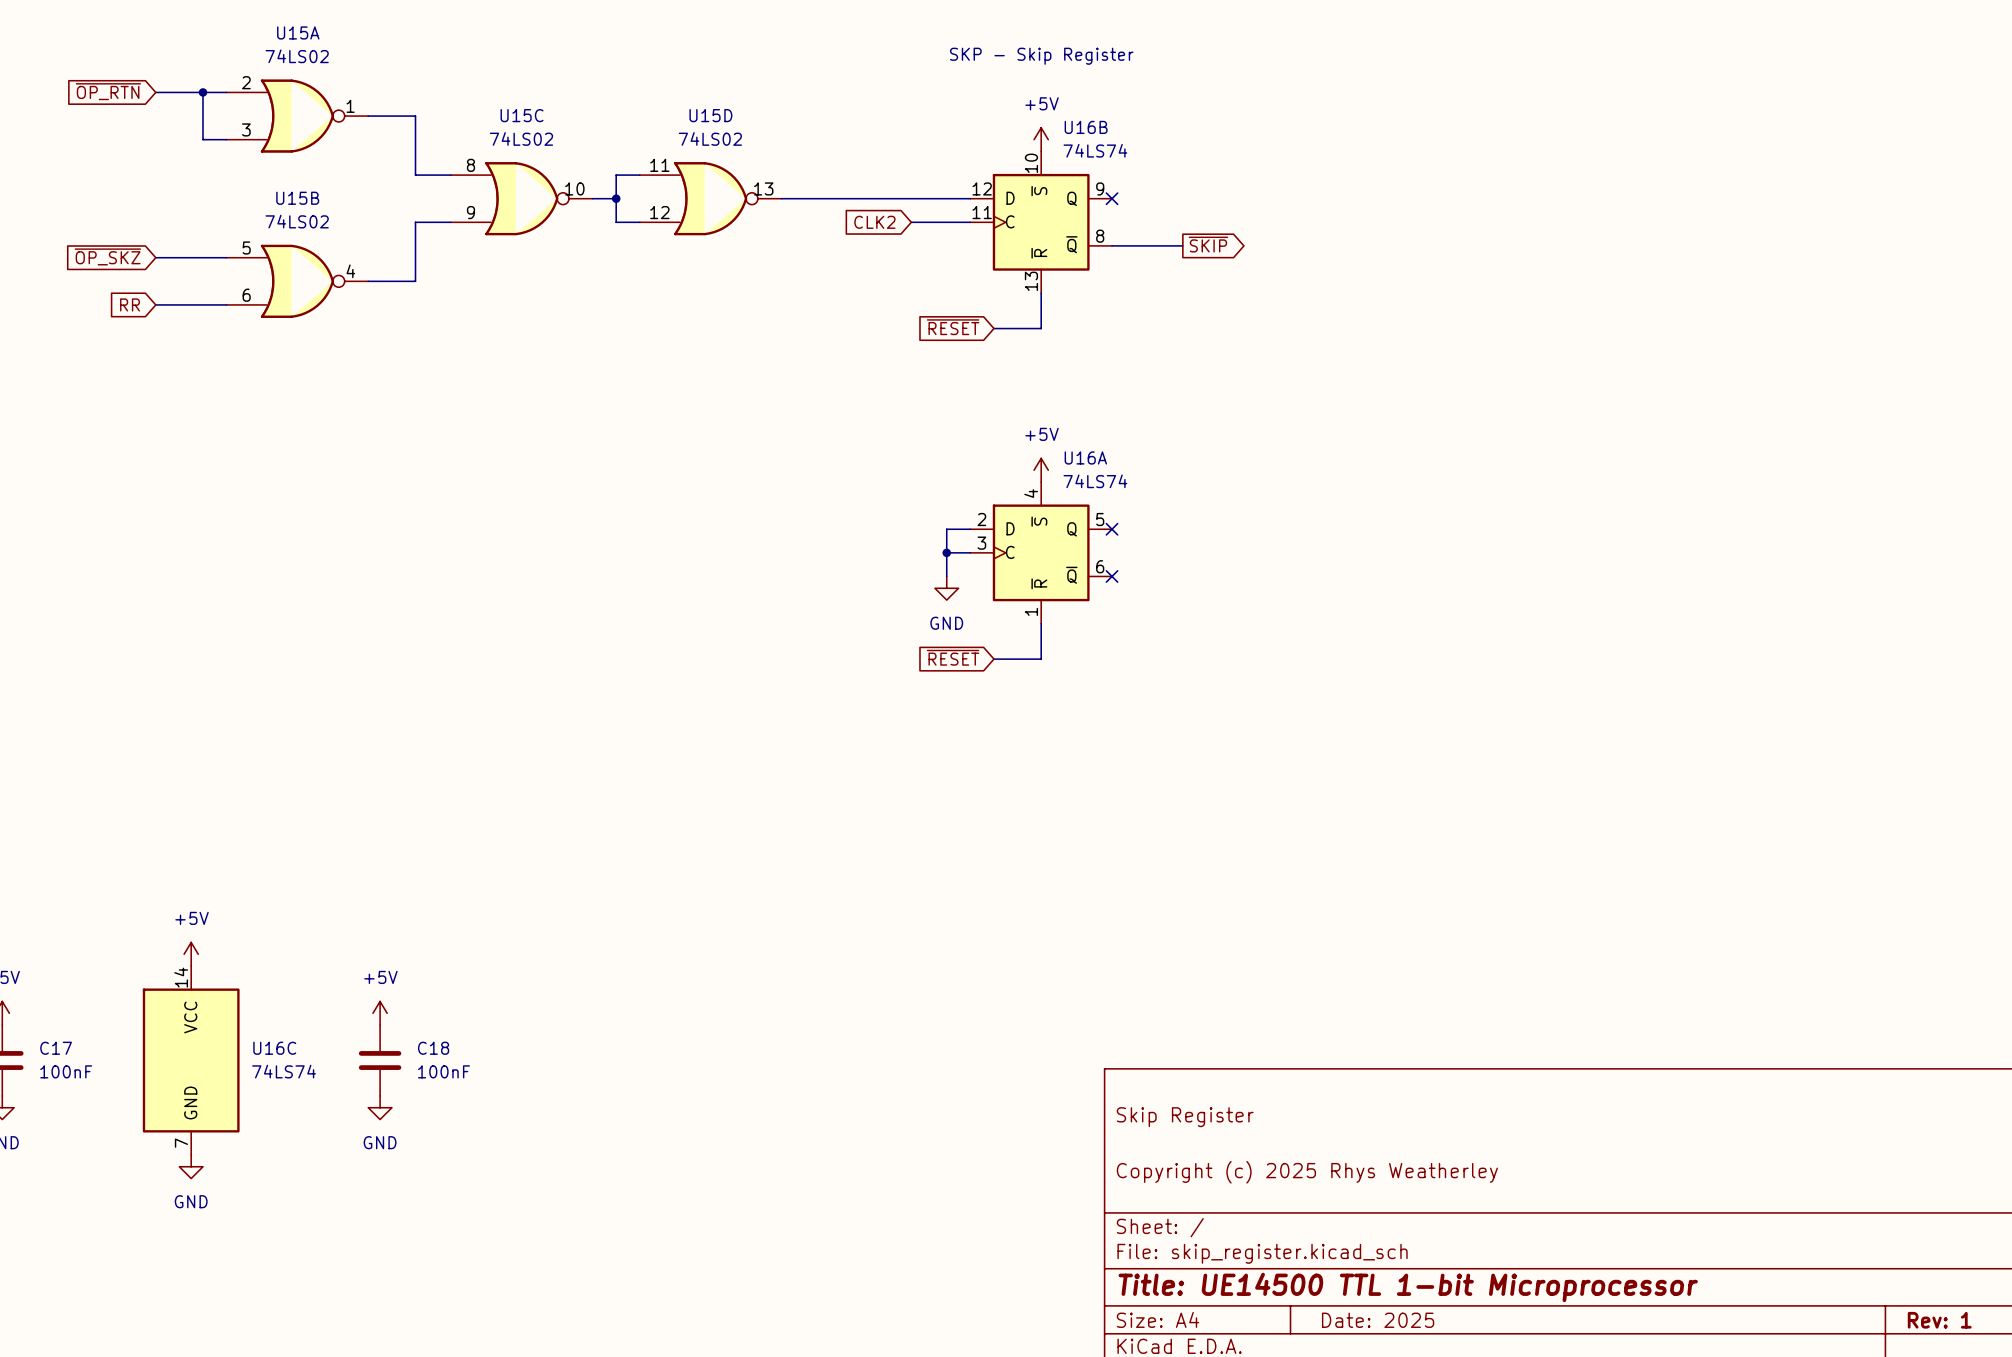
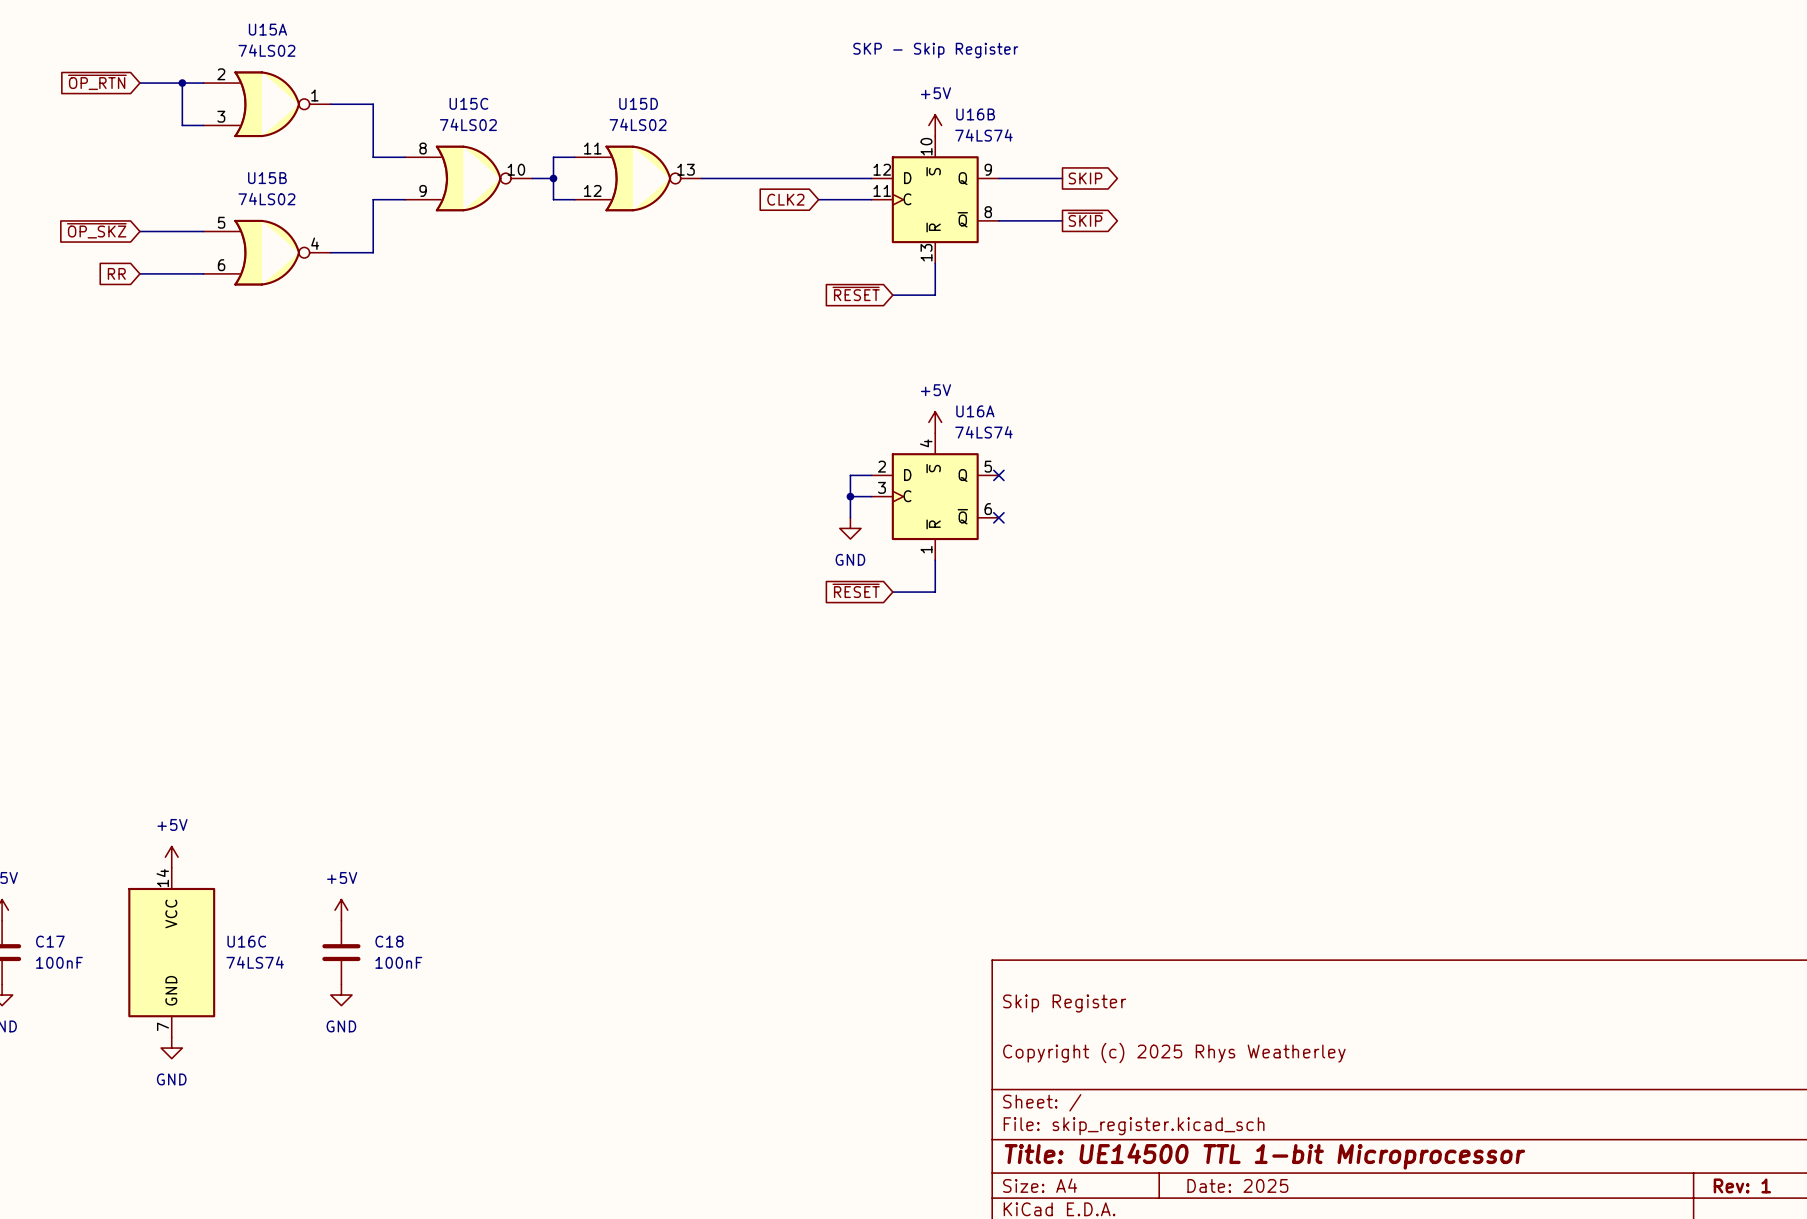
wire: none -> (998, 178) (1062, 178)
no-connect mark: (1112, 198) -> none
global label: none -> SKIP (1085, 178)

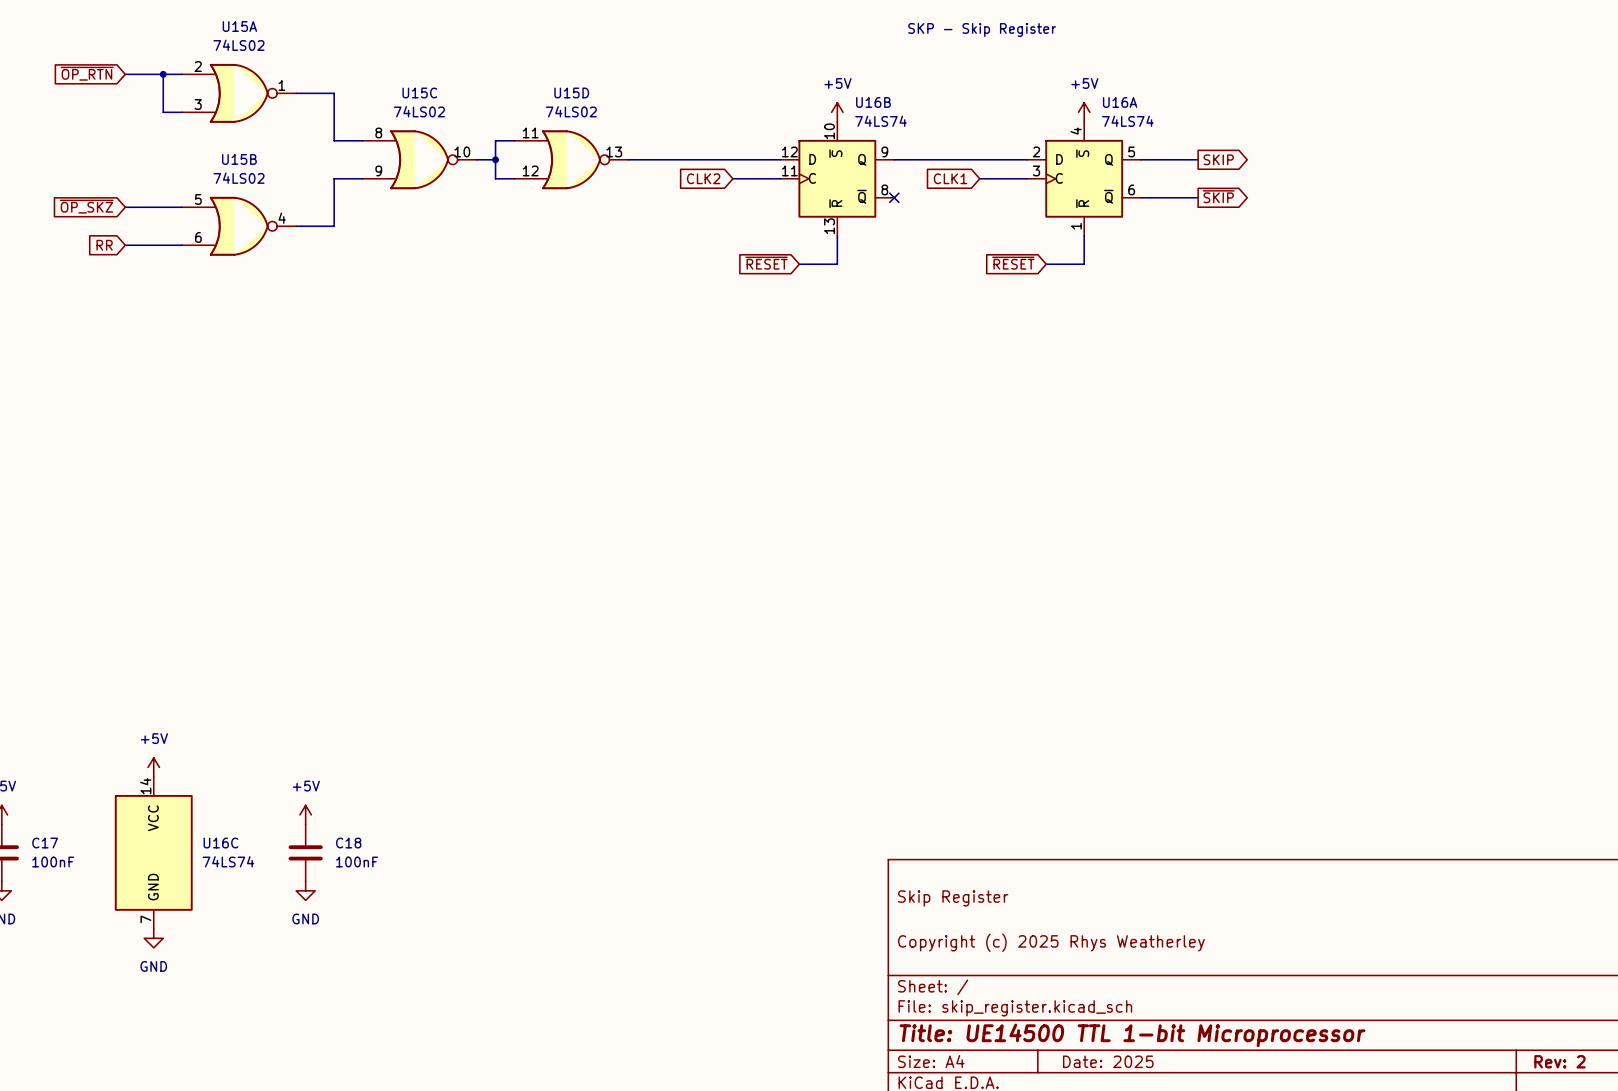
text position: SKP - Skip Register (935, 50) -> SKP - Skip Register (982, 30)
power symbol: none -> +5V (1084, 112)
wire: none -> (951, 159) (1027, 159)
global label: SKIP (1085, 178) -> none
wire: none -> (1141, 159) (1198, 159)
global label: none -> SKIP (1218, 159)
global label: none -> CLK1 (950, 178)
wire: none -> (979, 178) (1027, 178)
global label: ~{SKIP} (1085, 219) -> none
global label: none -> ~{SKIP} (1218, 196)
wire: (998, 220) (1062, 220) -> none
no-connect mark: none -> (894, 197)
wire: none -> (1141, 197) (1198, 197)
wire: none -> (1084, 235) (1084, 264) (1046, 264)
global label: none -> ~{RESET} (1013, 263)
power symbol: +5V (935, 422) -> none
wire: (871, 475) (850, 475) (850, 517) -> none
no-connect mark: (998, 475) -> none
wire: (850, 496) (871, 496) -> none
junction: (850, 496) -> none
U16A position: (935, 496) -> (1084, 178)
no-connect mark: (998, 517) -> none
power symbol: GND (850, 528) -> none
wire: (935, 560) (935, 592) (892, 592) -> none
global label: ~{RESET} (856, 590) -> none
title block: Rev: 1 (1742, 1185) -> Rev: 2 (1559, 1061)

